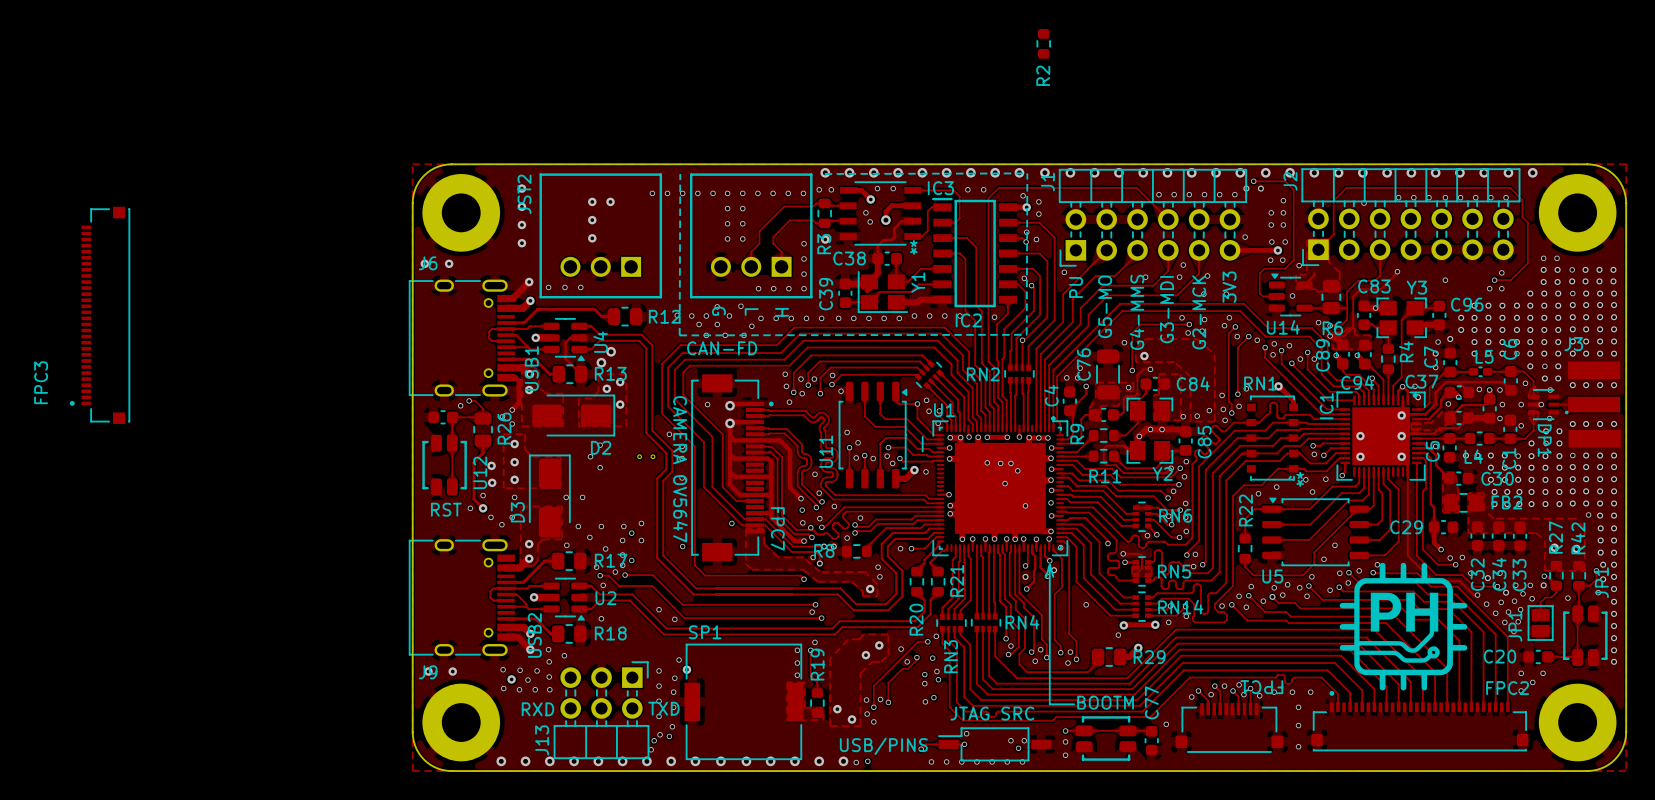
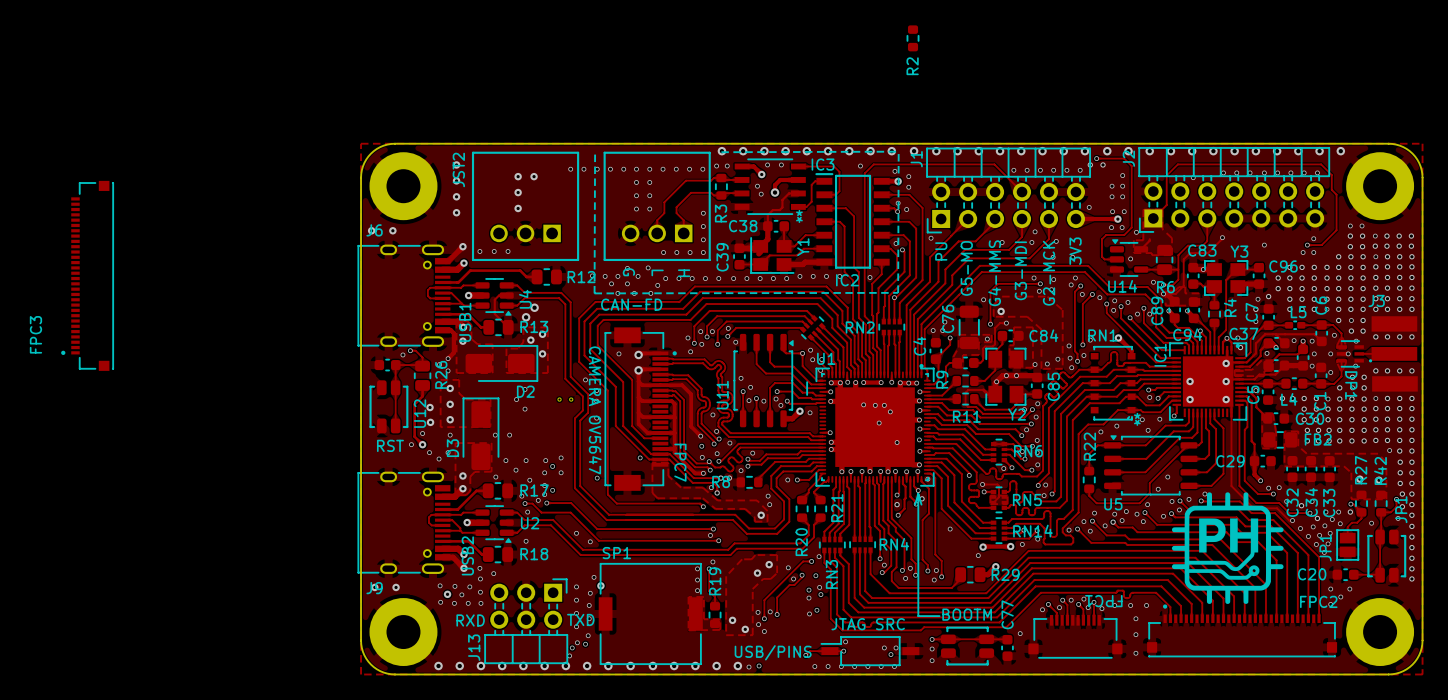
via: (967, 189) -> none
via: (825, 239) -> none
via: (785, 374) -> none

